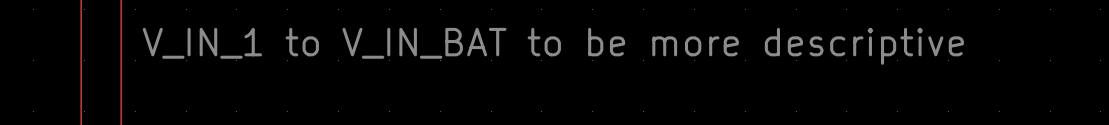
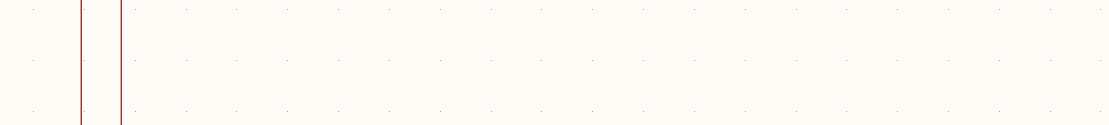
text: V_IN_1 to V_IN_BAT to be more descriptive (553, 46) -> none

